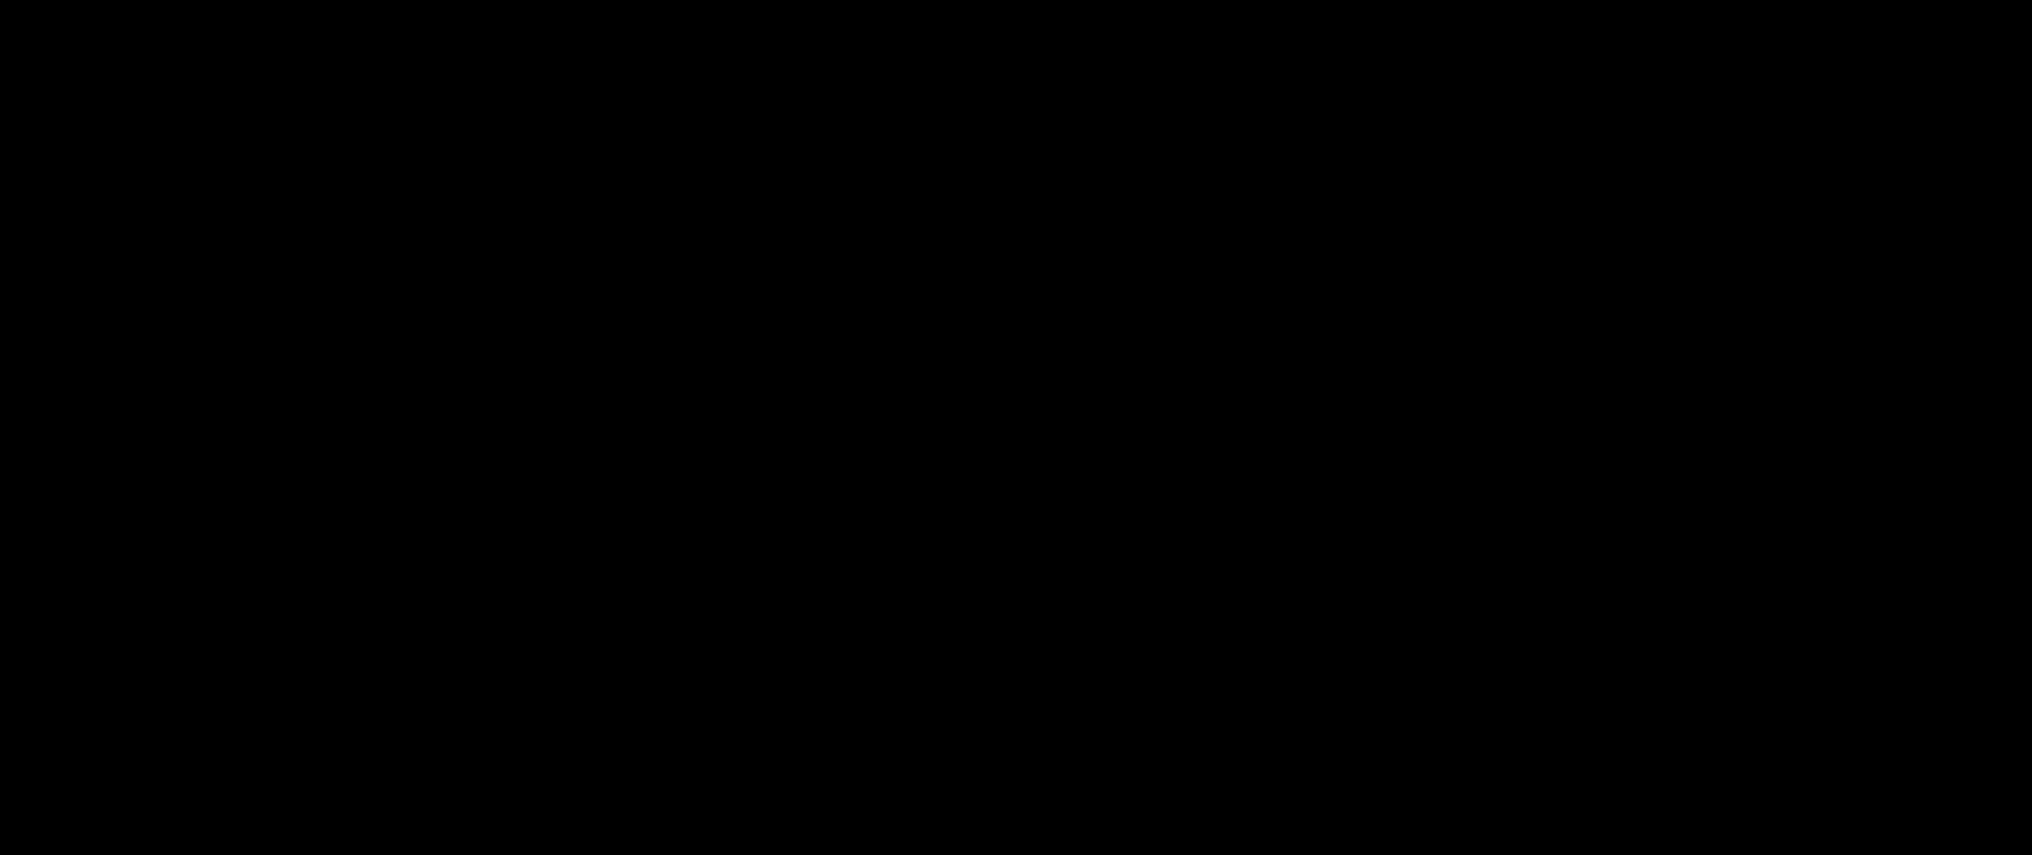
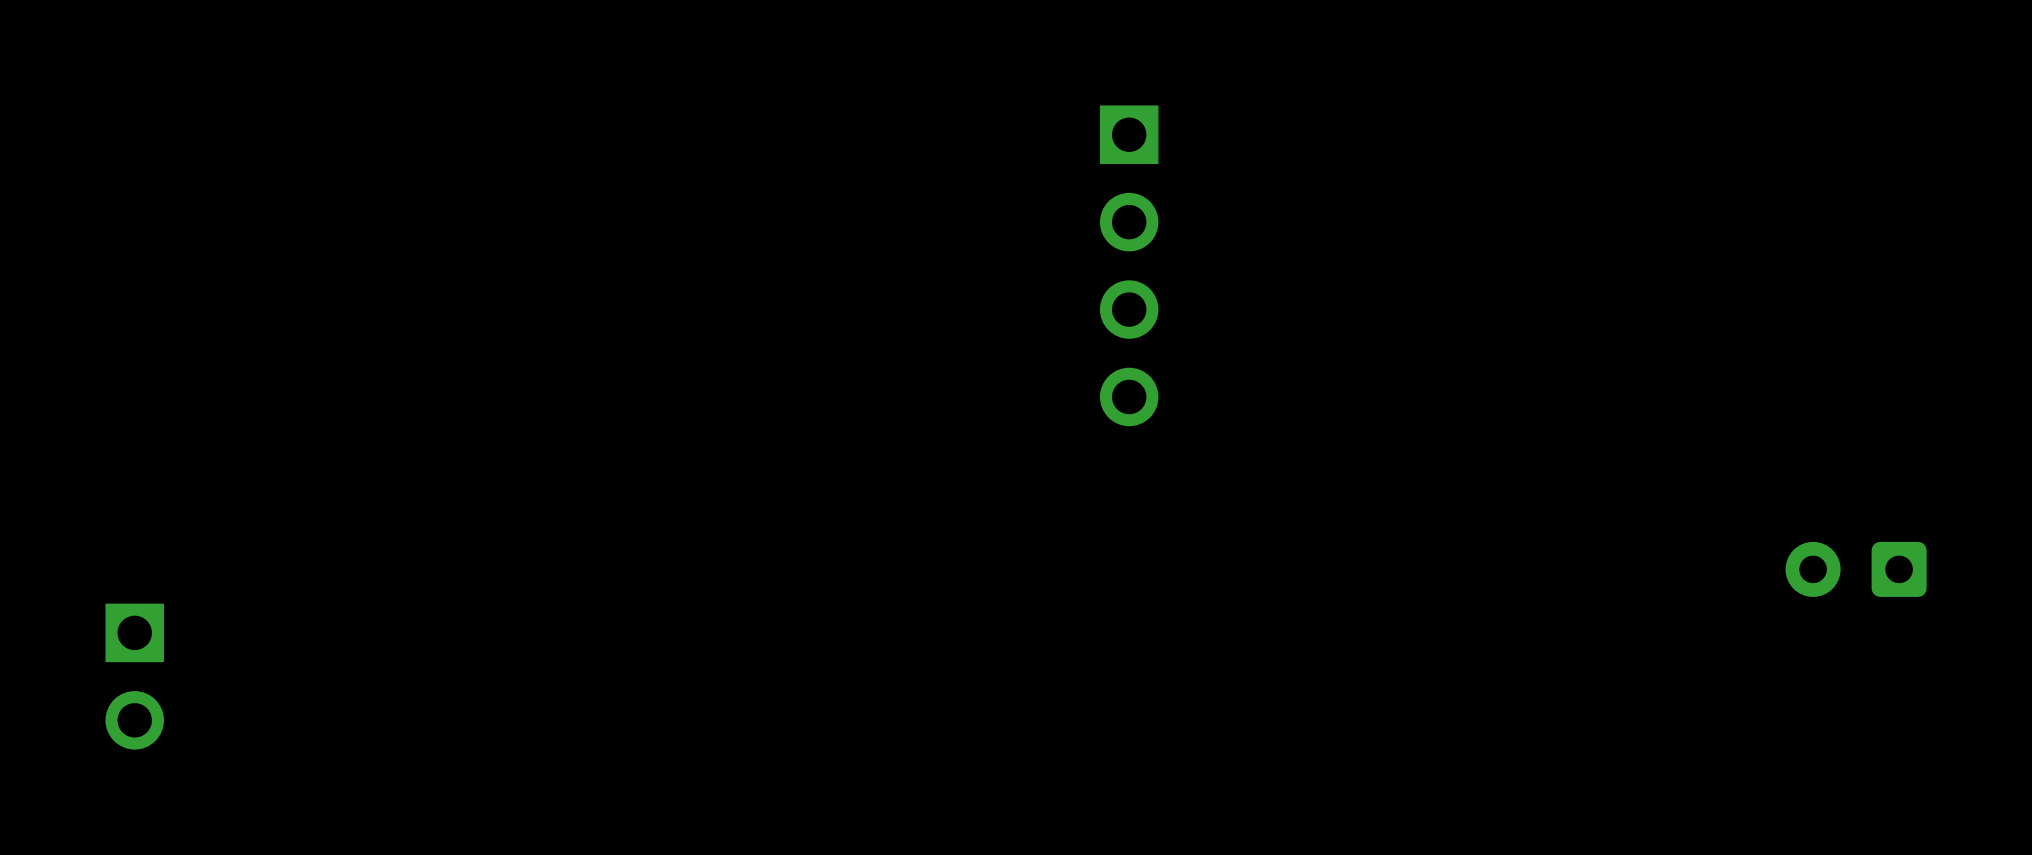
part: none -> (1129, 265)
part: none -> (1856, 569)
part: none -> (134, 676)

